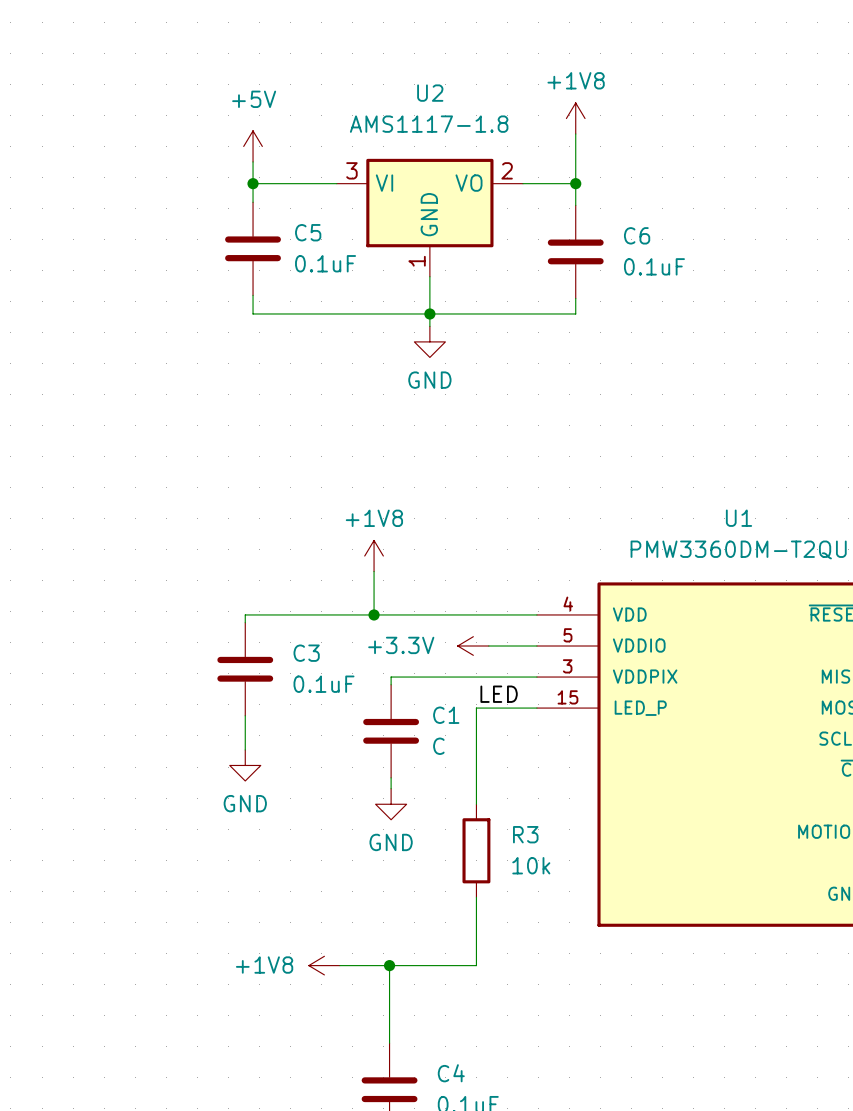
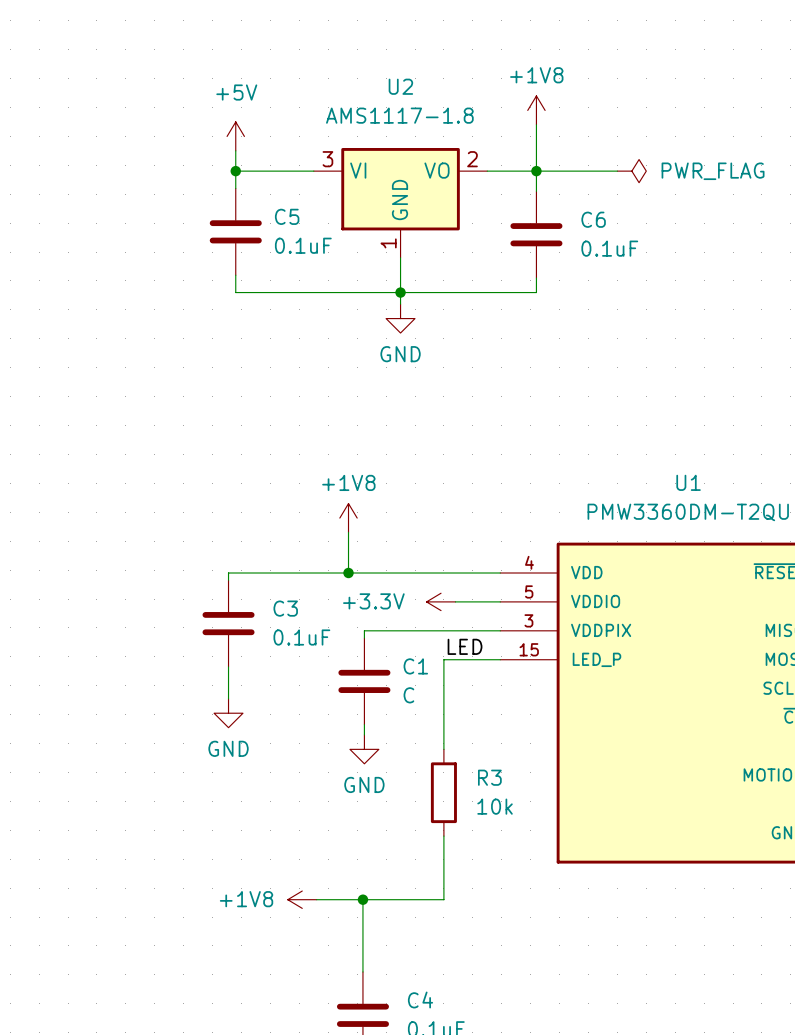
wire: none -> (536, 171) (617, 171)
power symbol: none -> PWR_FLAG (631, 171)

